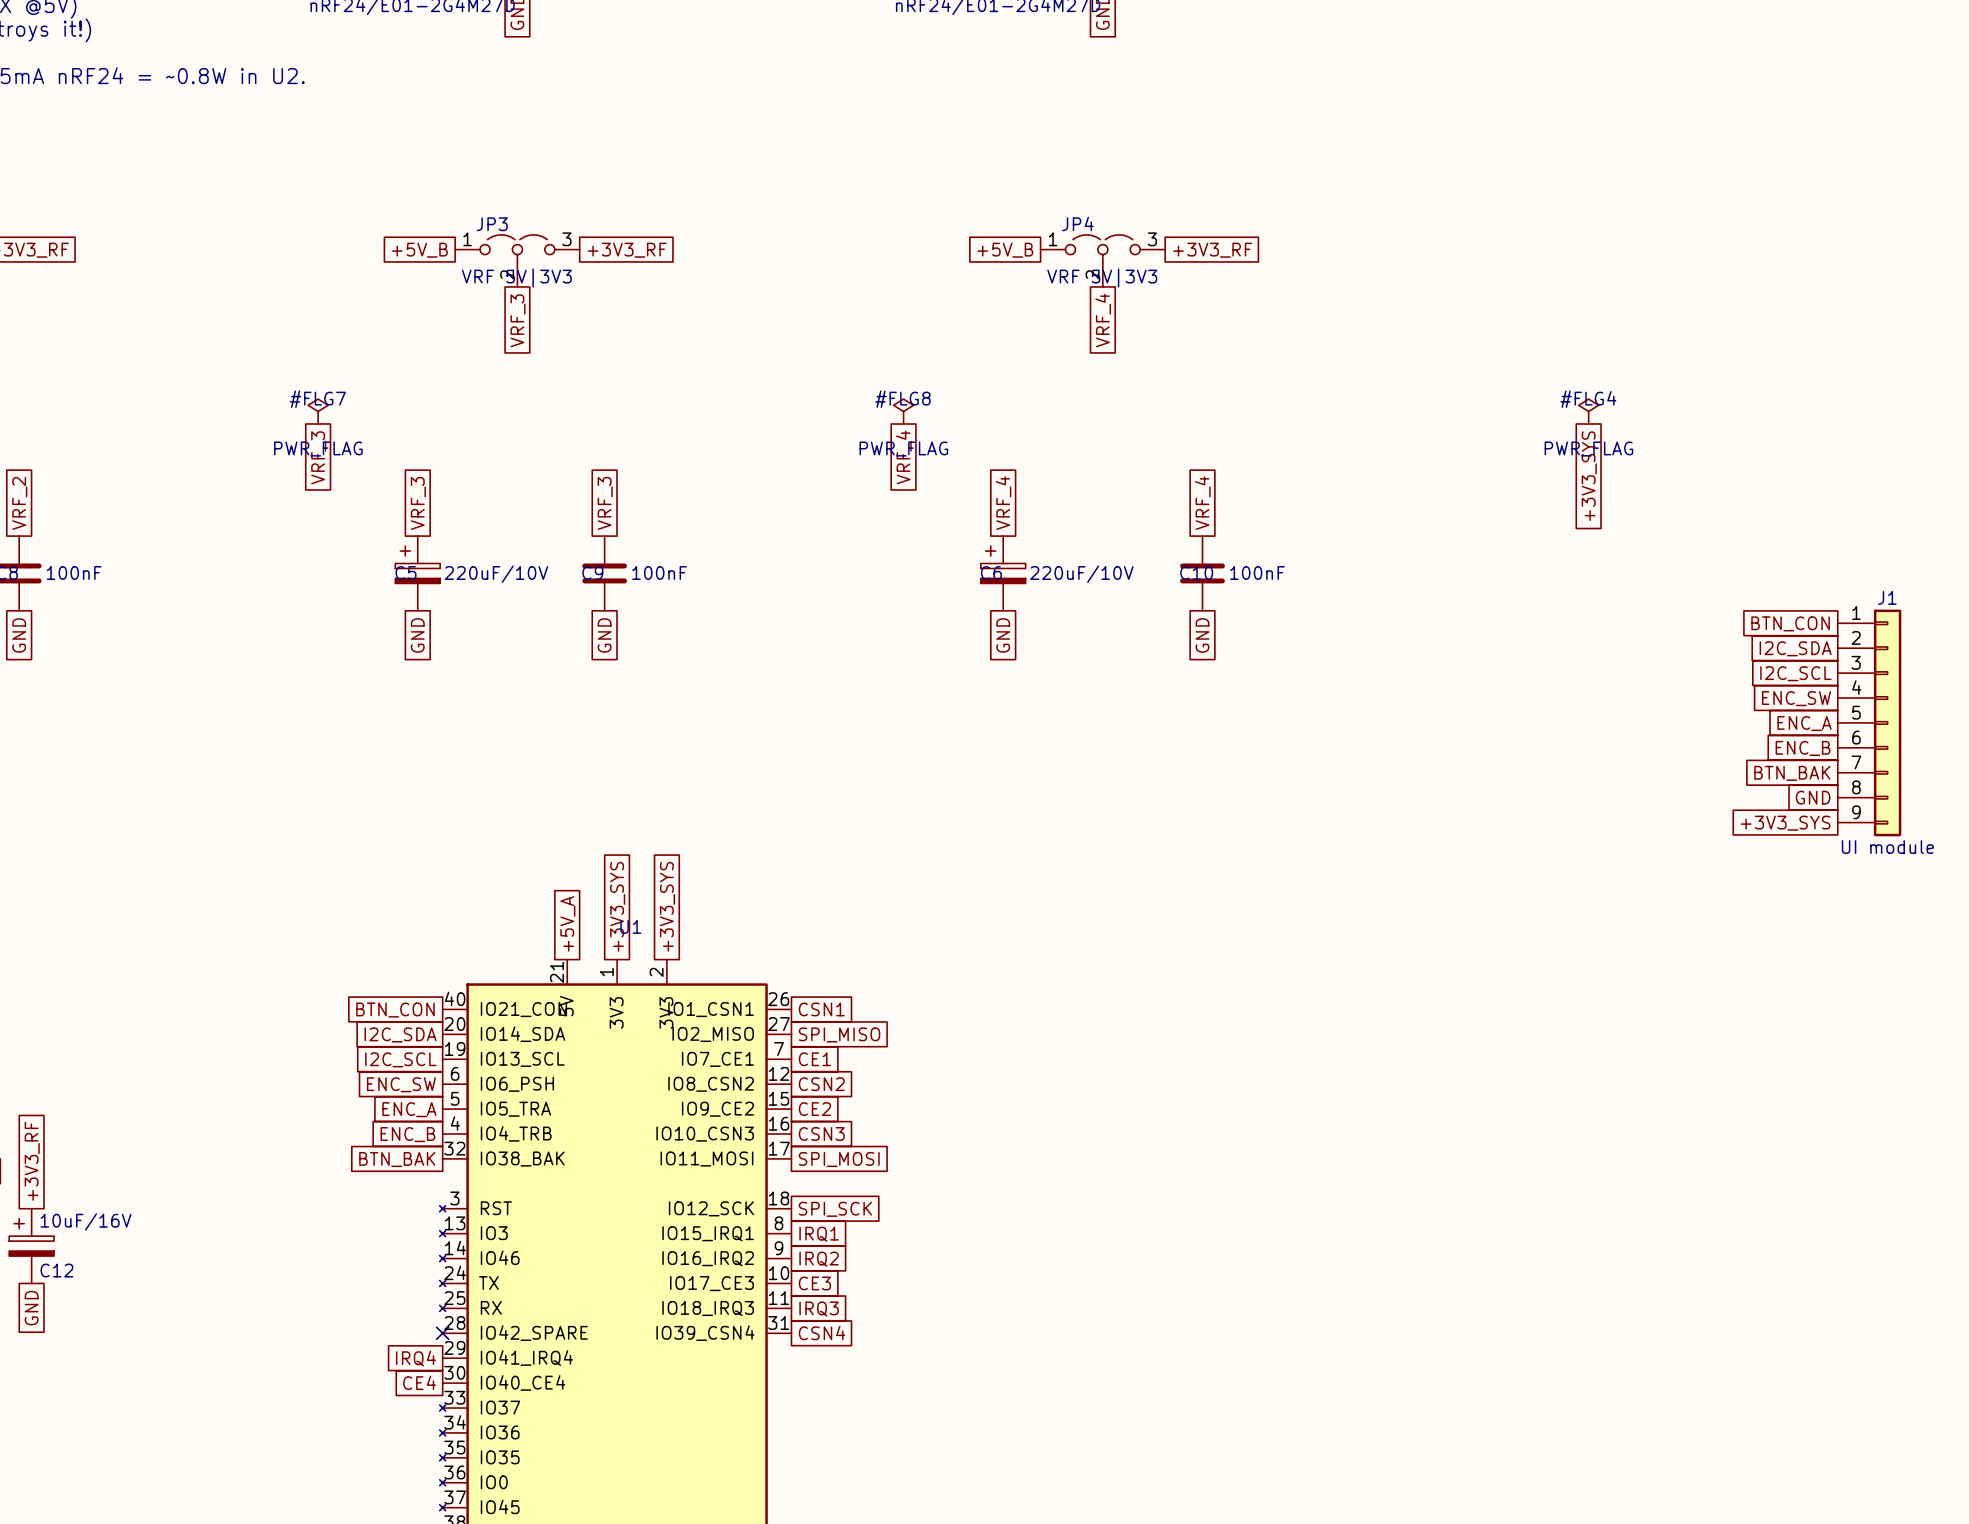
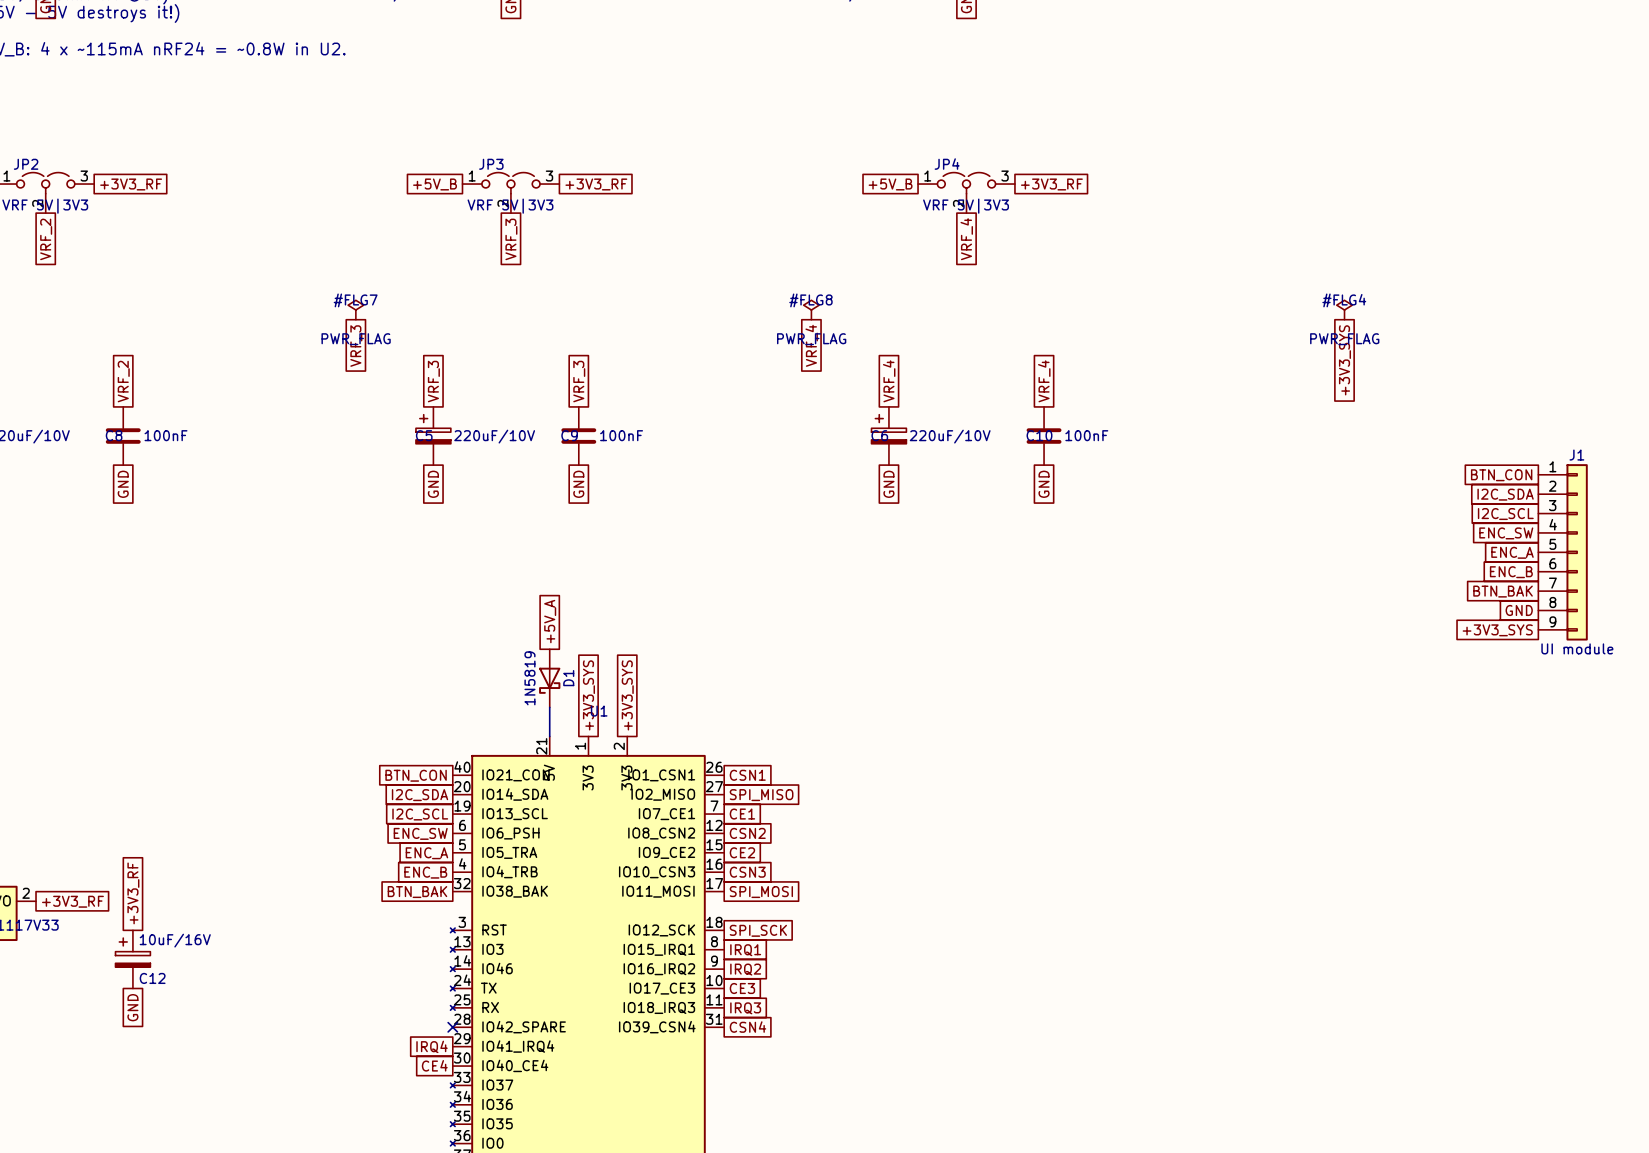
D1: none -> 1N5819 (549, 678)
wire: none -> (549, 707) (549, 736)
global label position: +5V_A (567, 923) -> +5V_A (550, 621)

